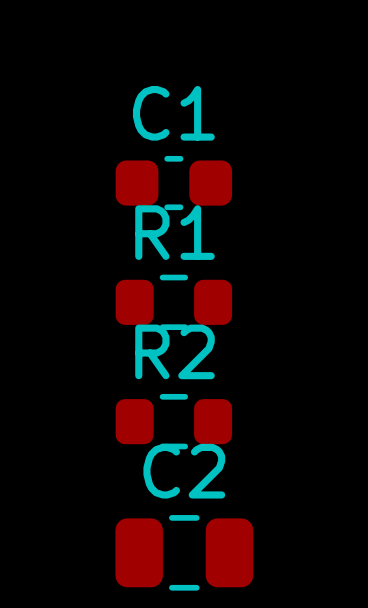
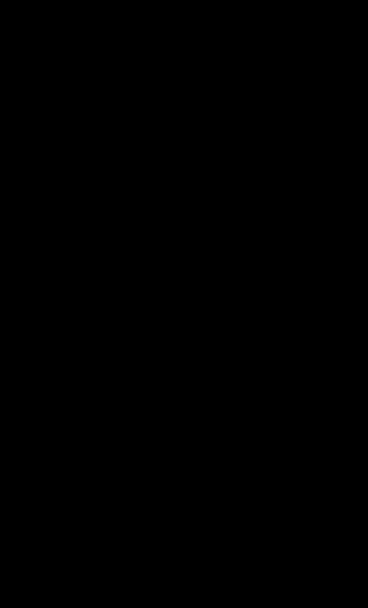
C1: (173, 183) -> none
R1: (173, 302) -> none
R2: (173, 421) -> none
C2: (184, 552) -> none

